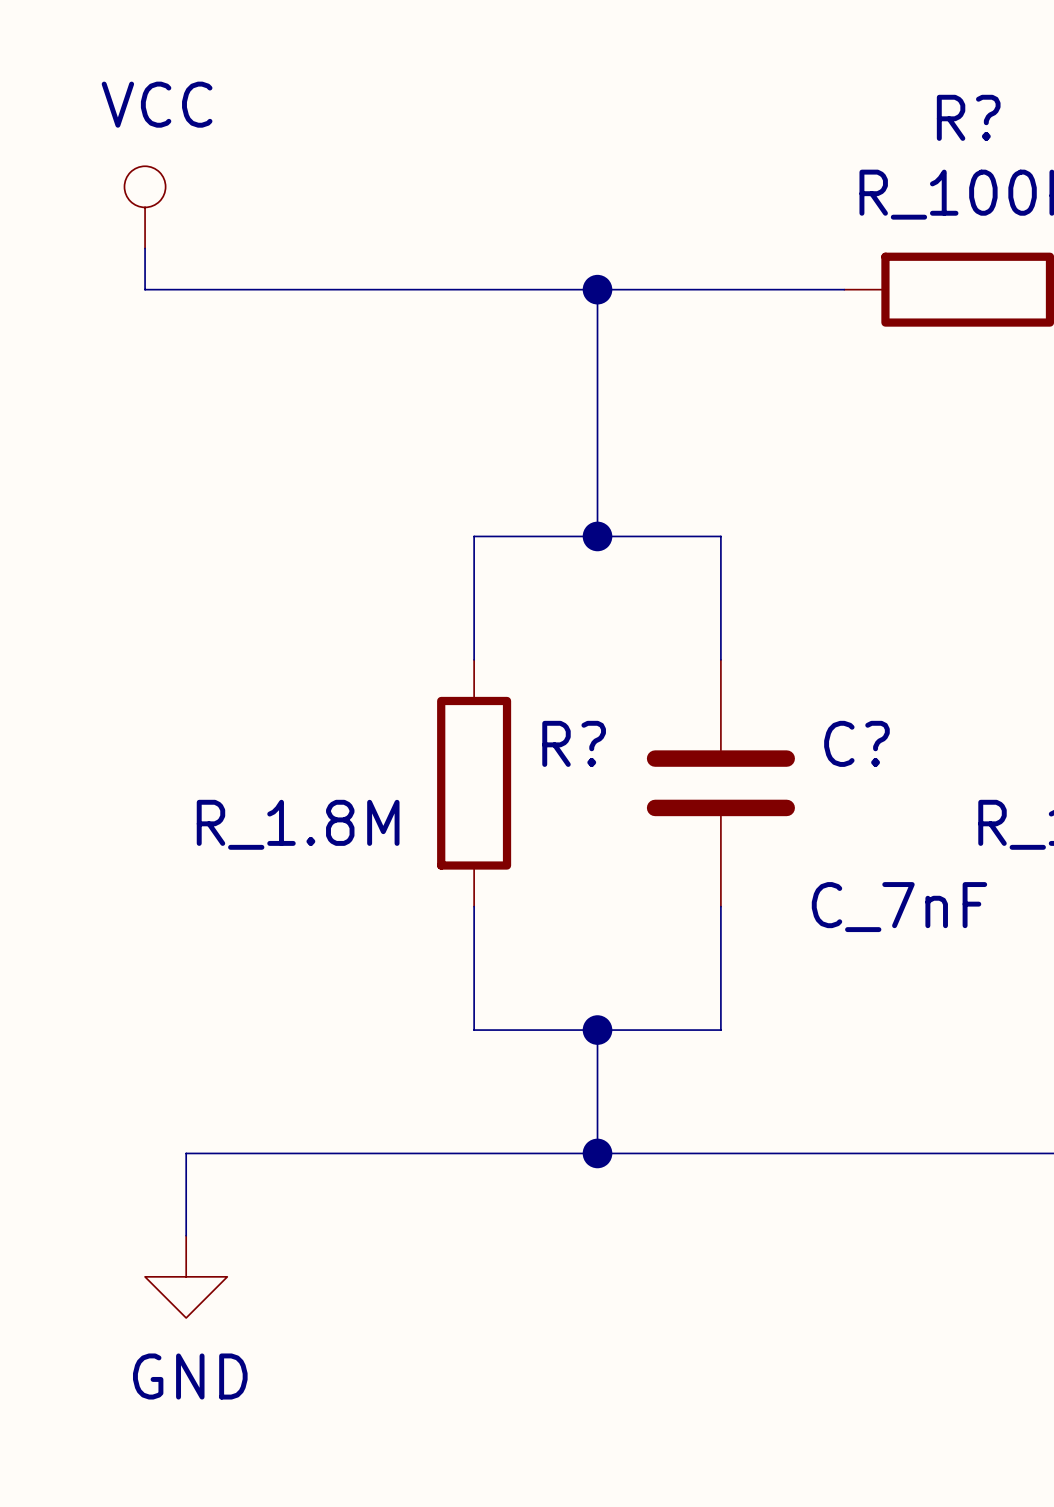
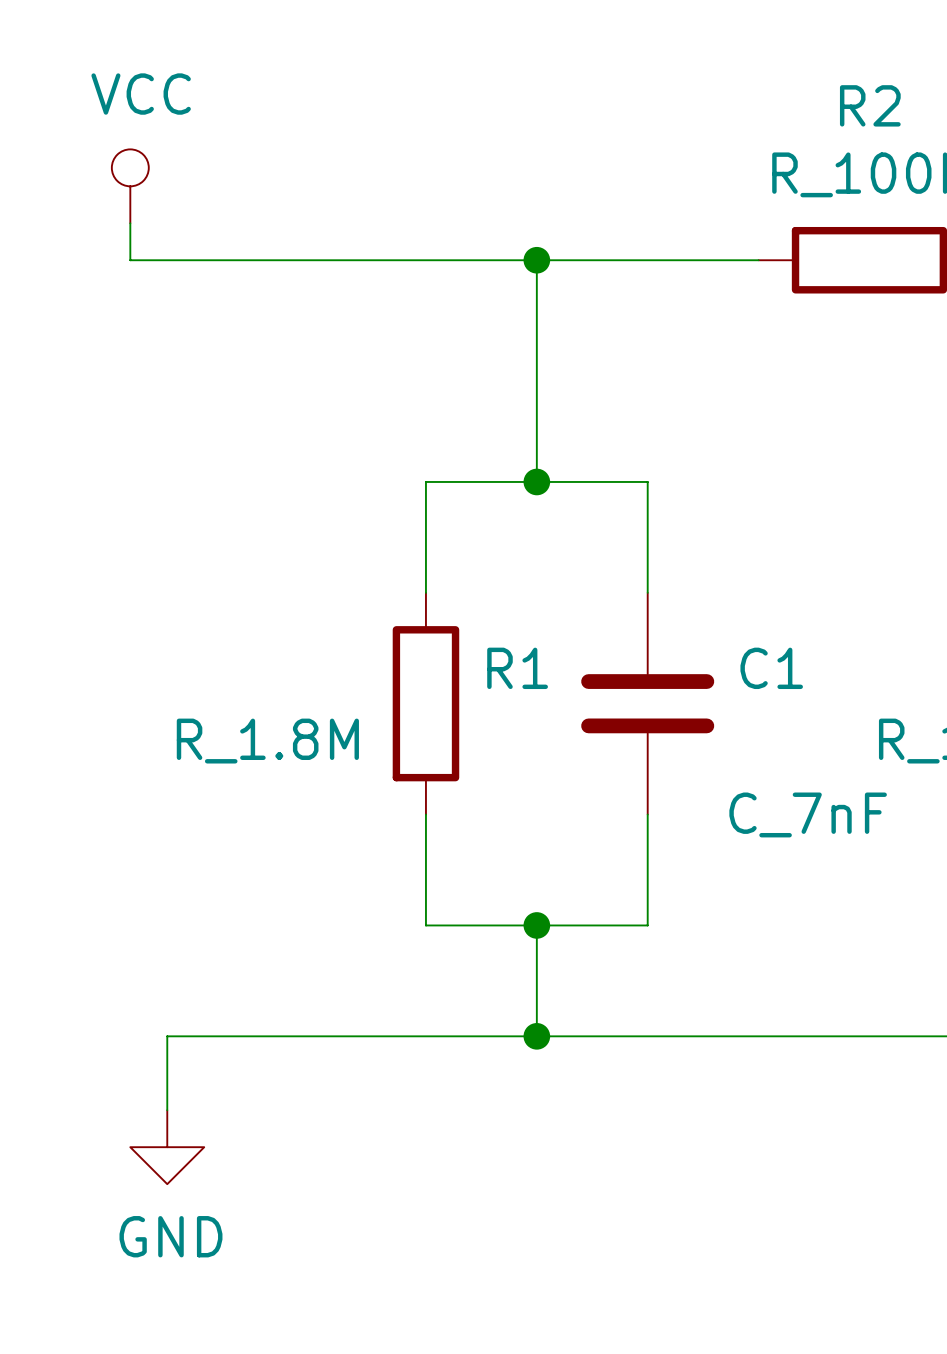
R? name: R? (968, 117) -> R2 (870, 105)
R? name: R? (574, 743) -> R1 (517, 668)
C? name: C? (856, 743) -> C1 (771, 668)

